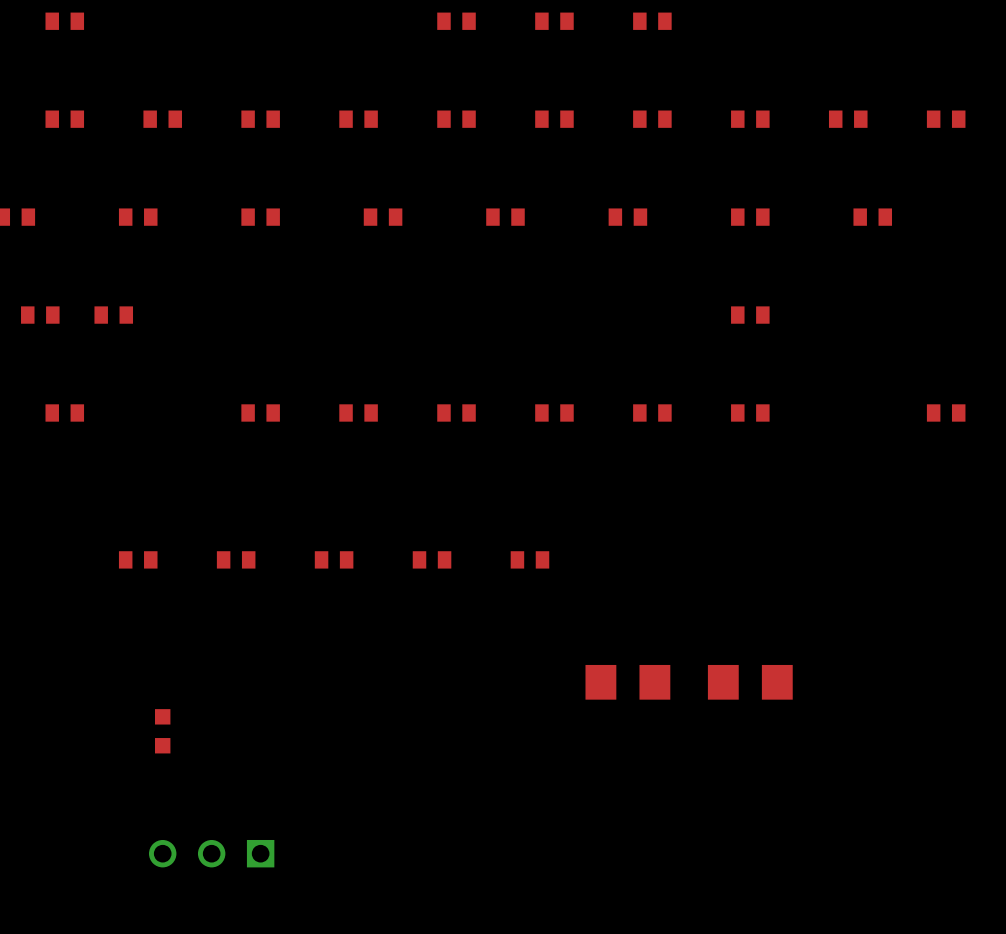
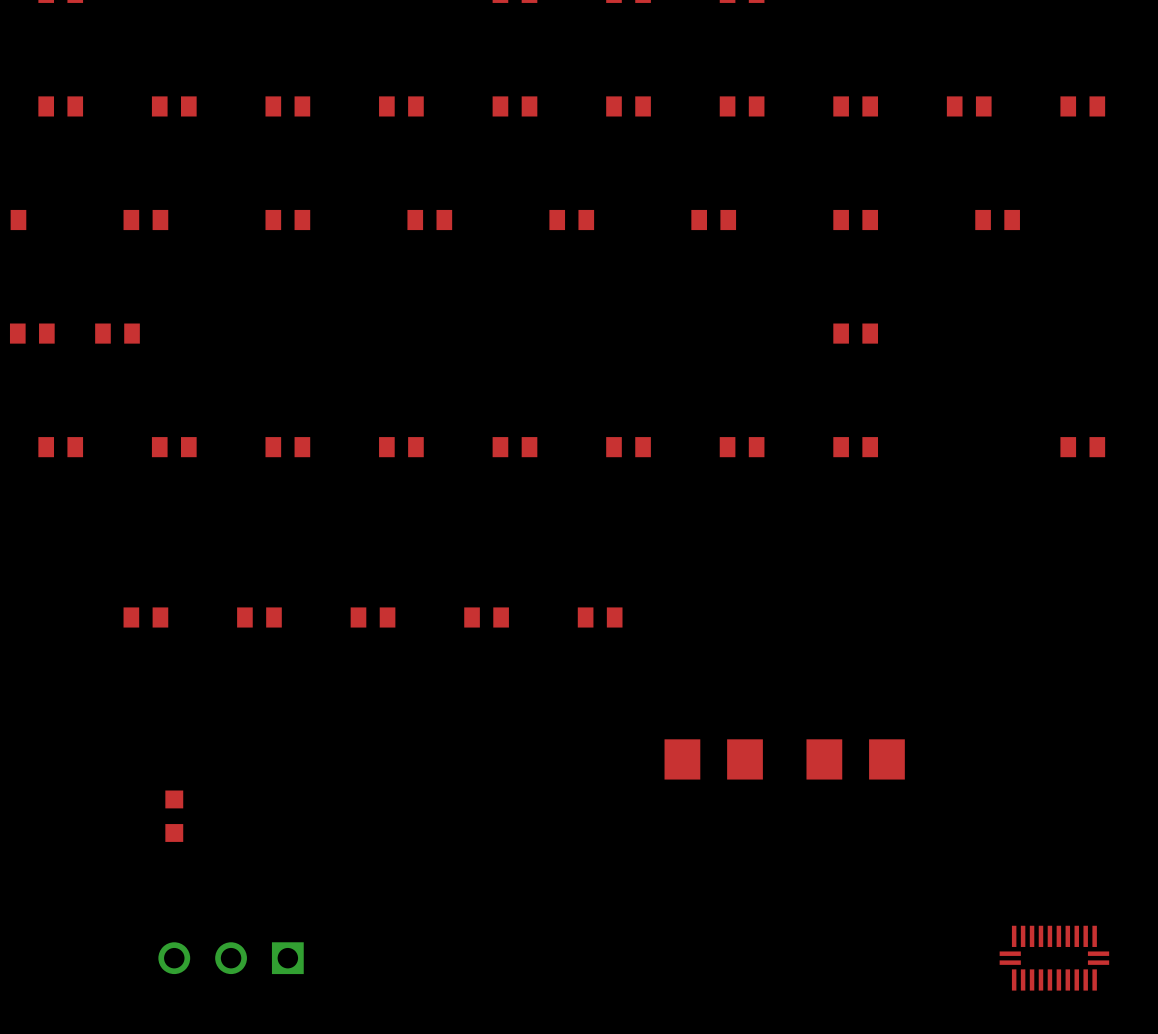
part: none -> (174, 447)
part: none -> (1054, 958)

